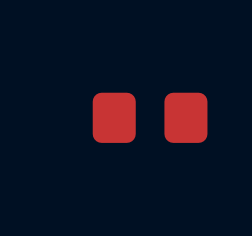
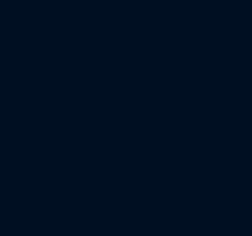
part: (150, 117) -> none

